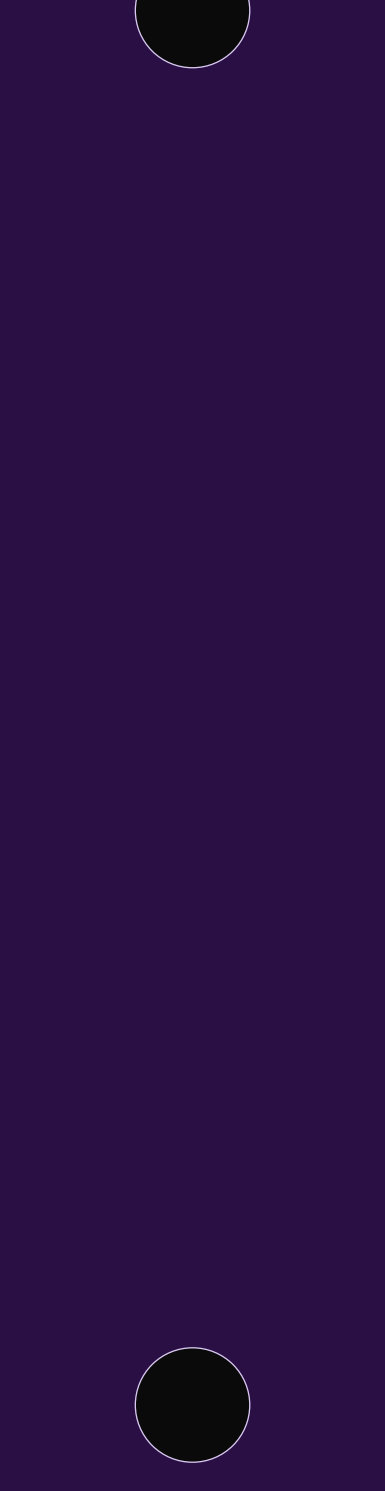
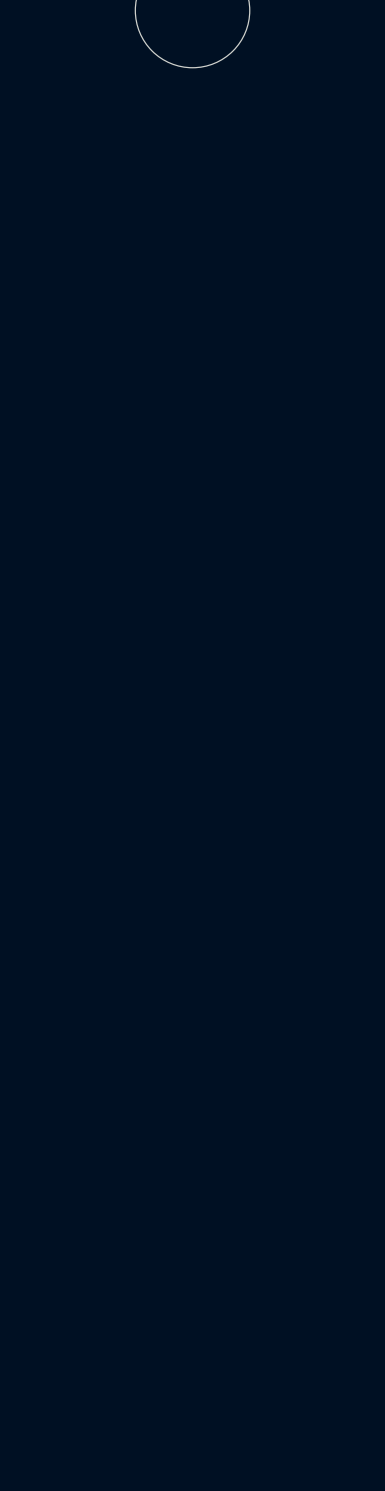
part: (192, 1405) -> none

